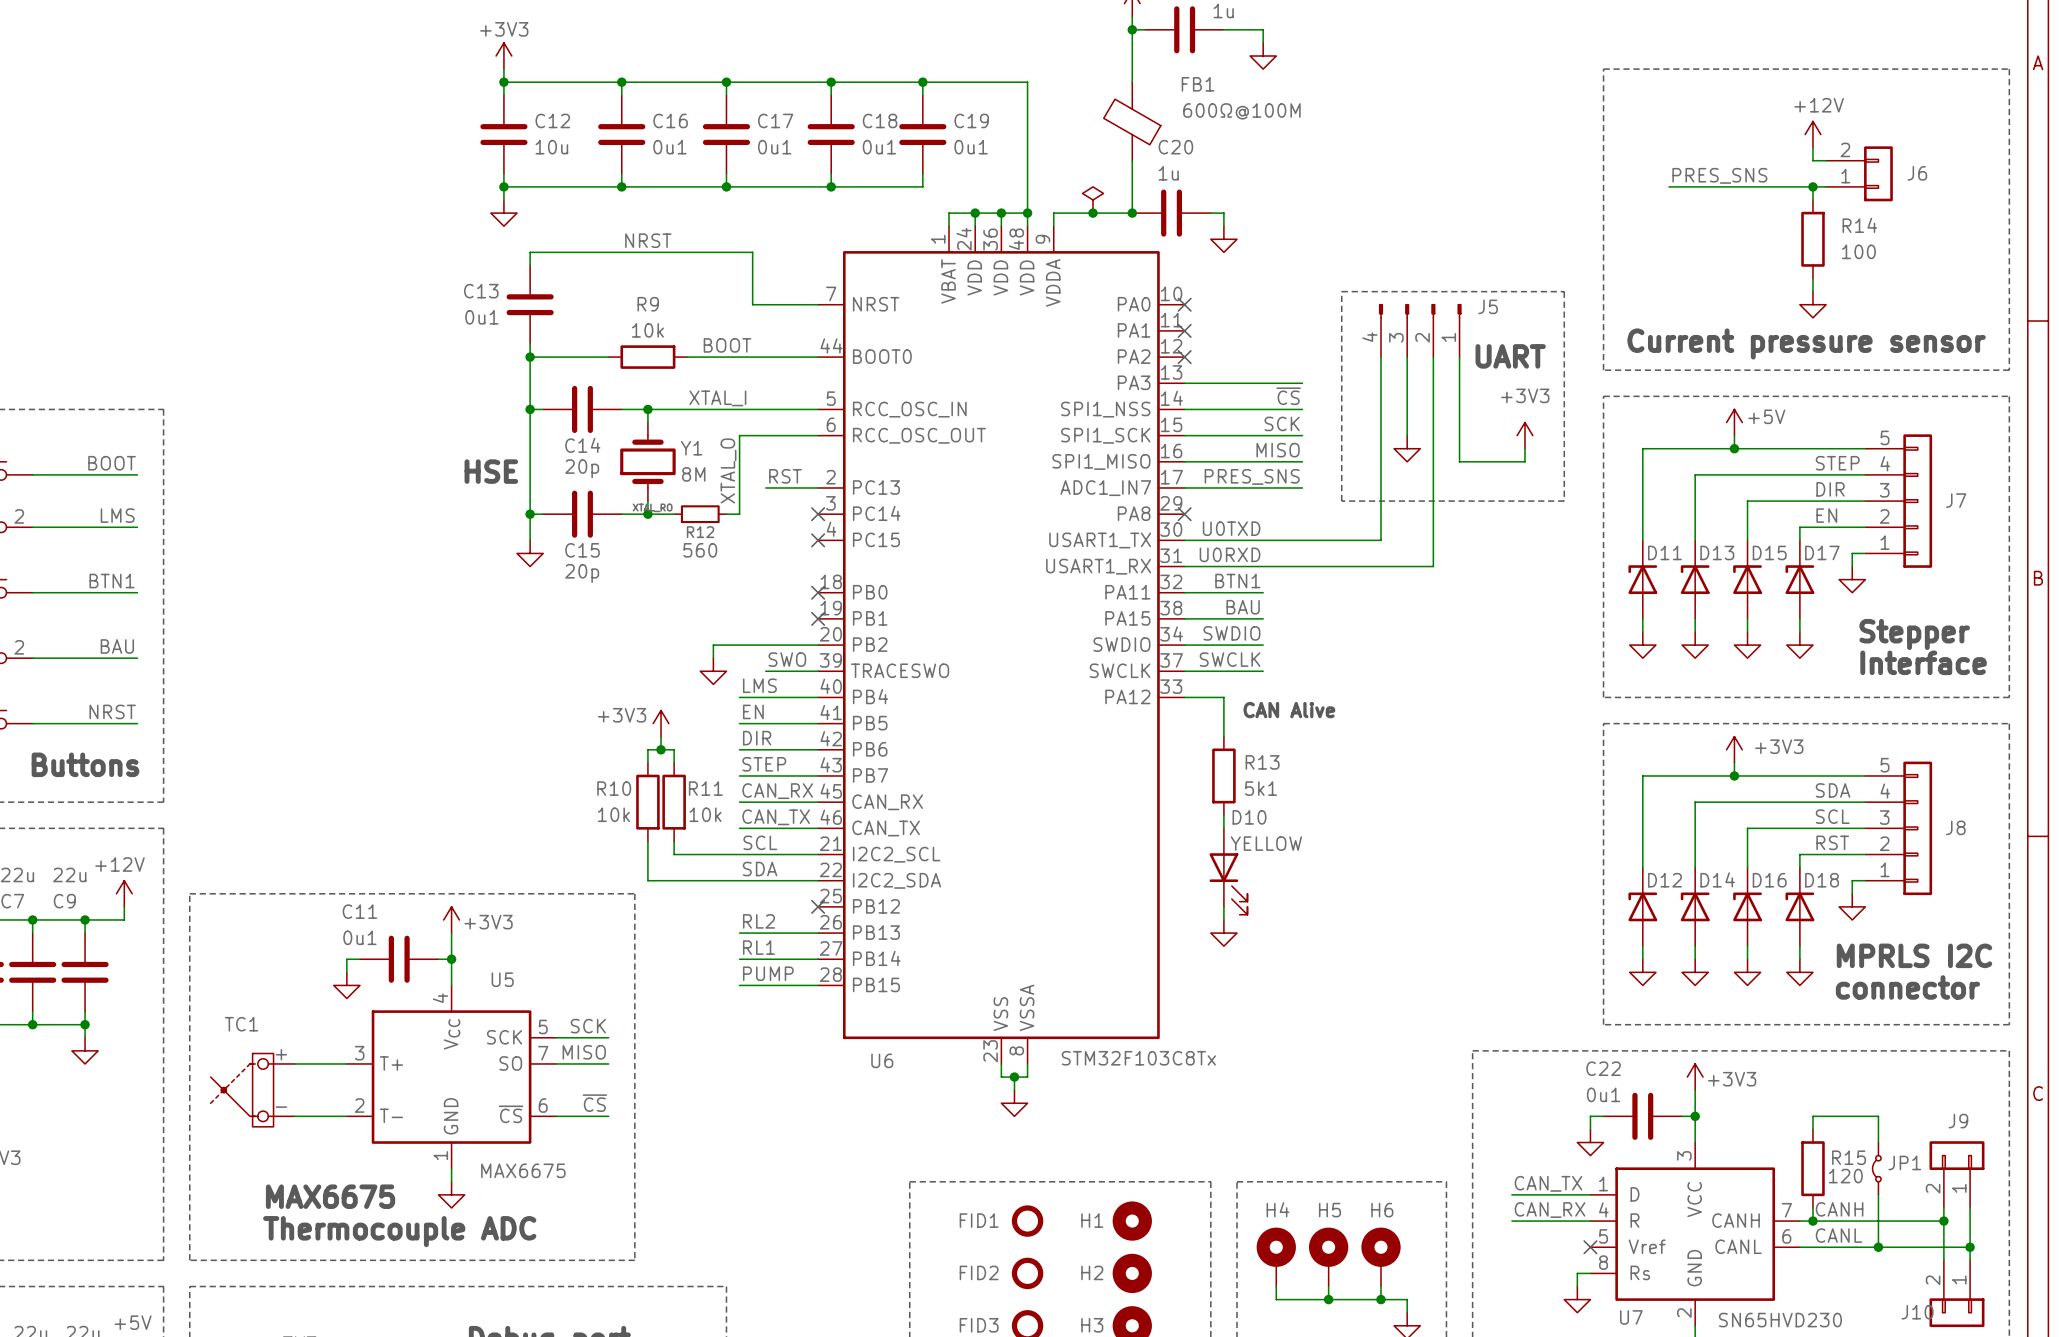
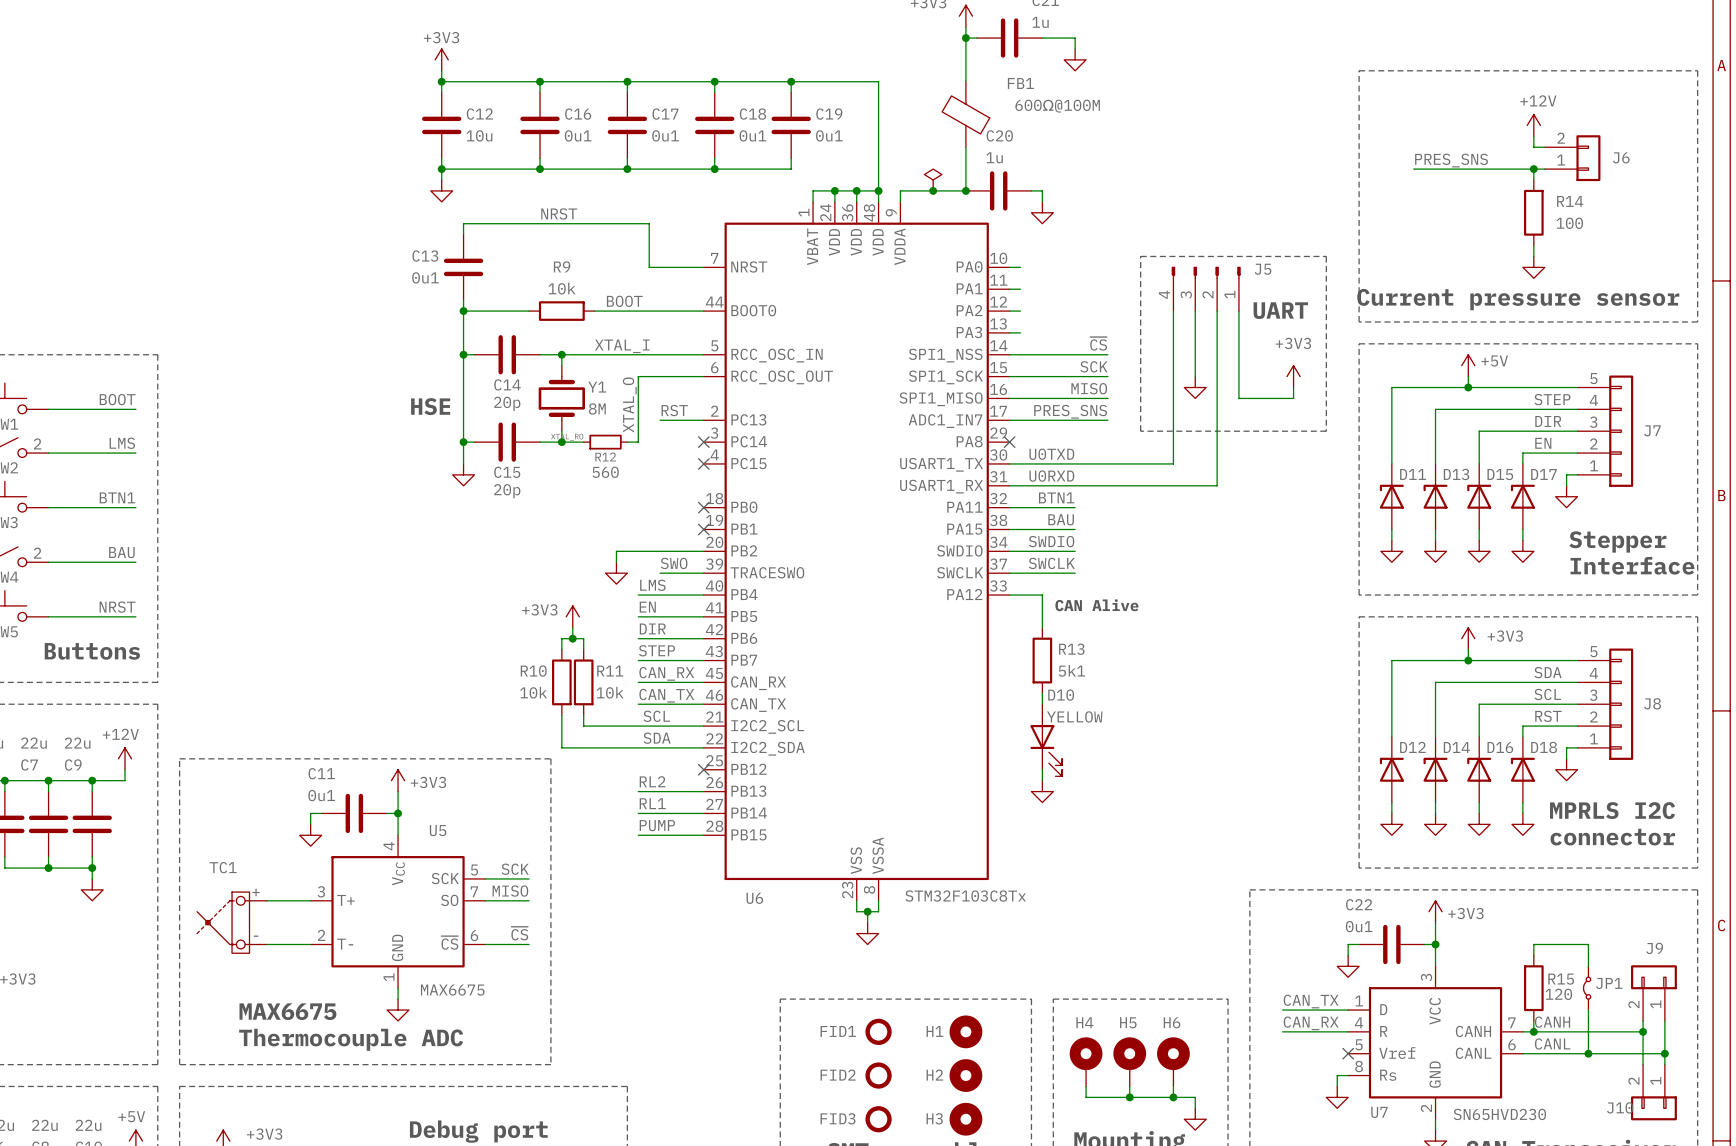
wire: none -> (1009, 267) (1020, 267)
no-connect mark: (1184, 304) -> none
wire: none -> (1009, 289) (1020, 289)
no-connect mark: (1184, 330) -> none
wire: none -> (1009, 311) (1020, 311)
no-connect mark: (1184, 357) -> none
wire: (1197, 383) (1302, 383) -> none

